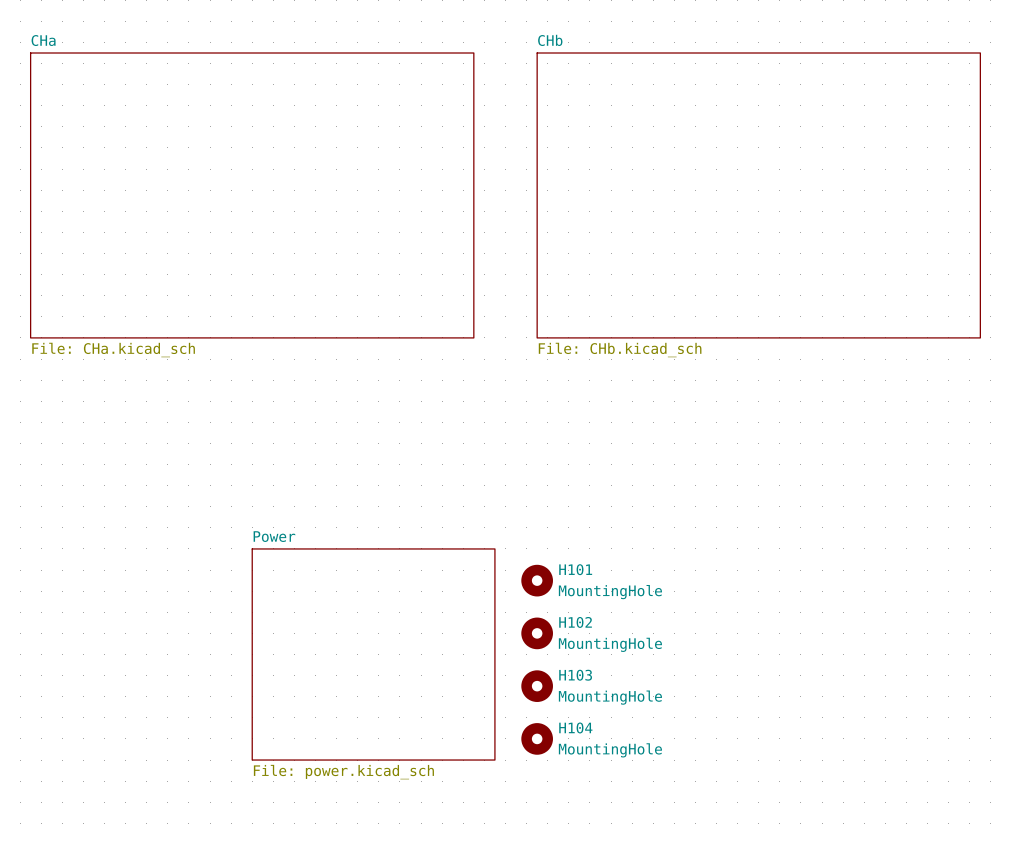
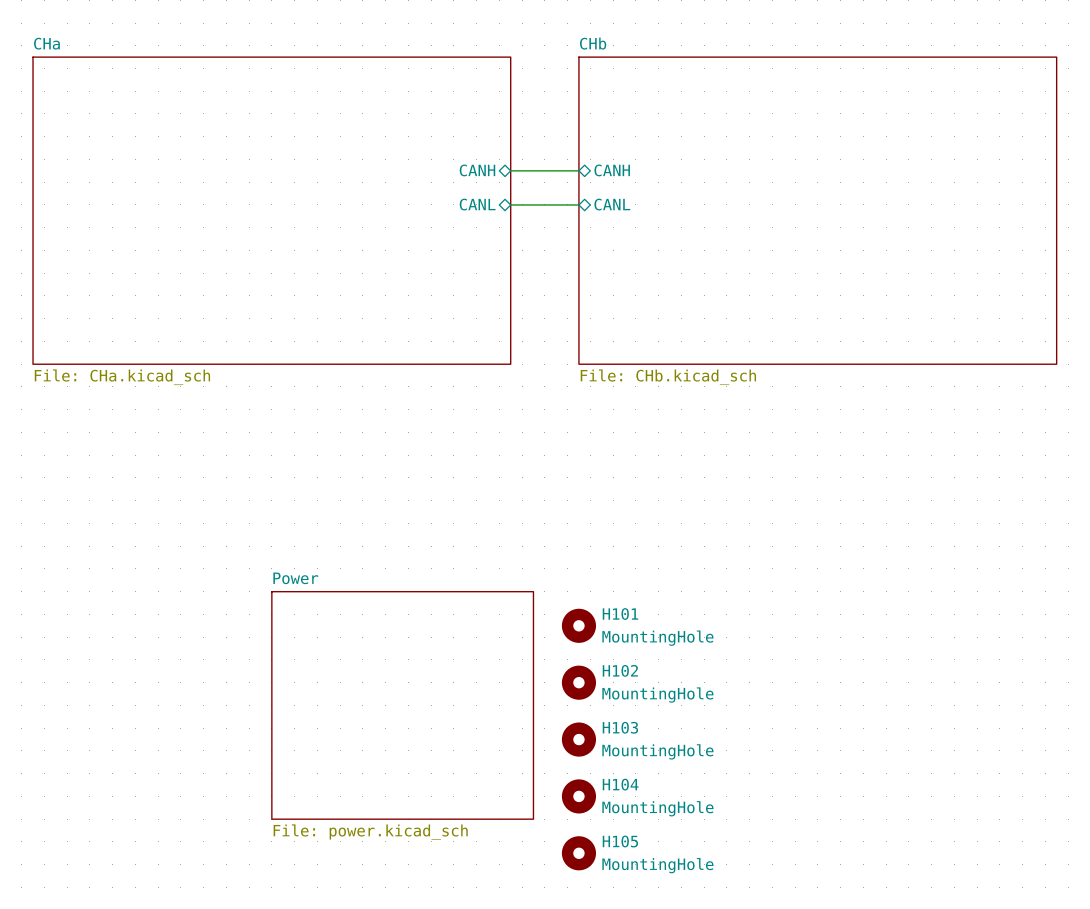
sheet pin: none -> CANH (477, 170)
wire: none -> (510, 170) (578, 170)
sheet pin: none -> CANH (612, 170)
sheet pin: none -> CANL (477, 204)
sheet pin: none -> CANL (612, 204)
wire: none -> (510, 204) (578, 204)
H105: none -> MountingHole (578, 853)

